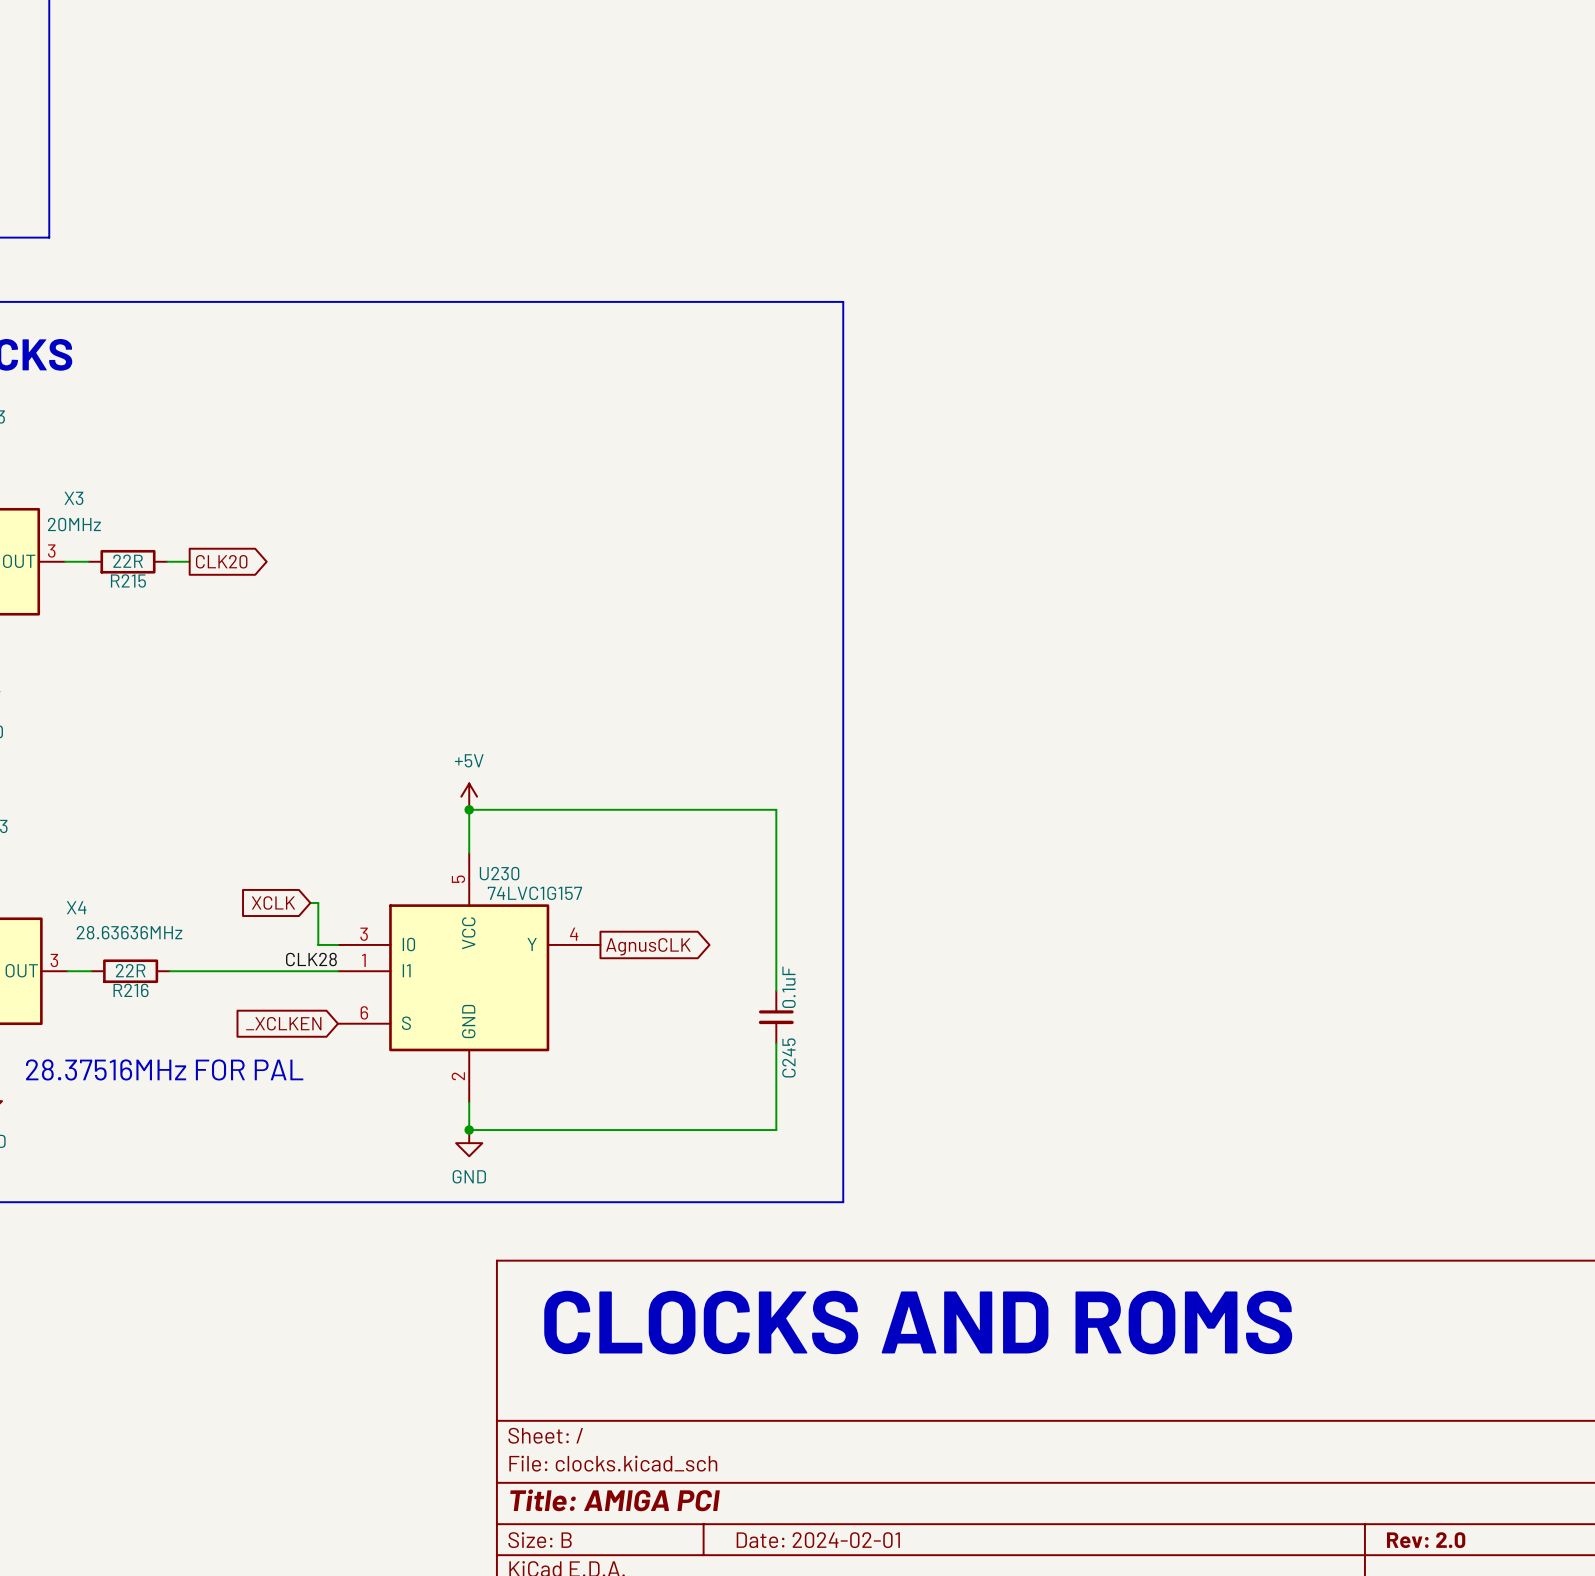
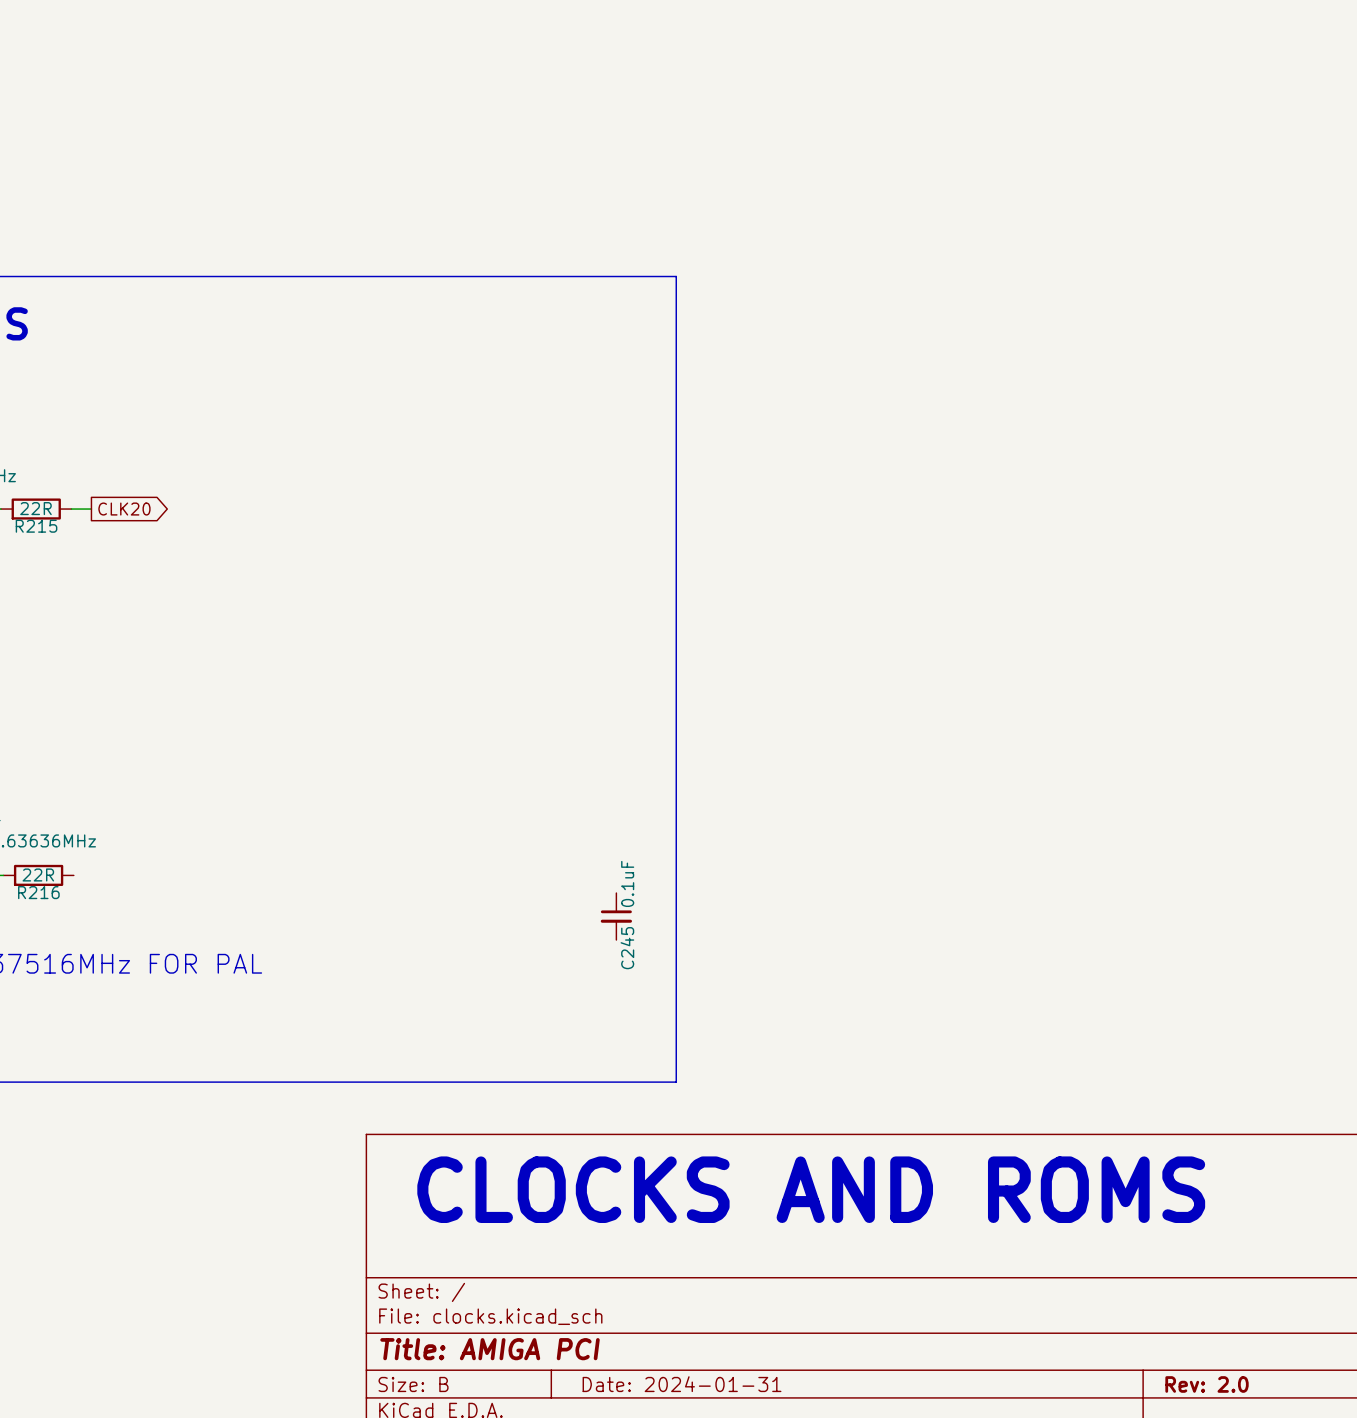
power symbol: +5V (469, 796) -> none
junction: (469, 809) -> none
wire: (469, 853) (469, 809) (776, 809) (776, 990) -> none
global label: XCLK (273, 902) -> none
wire: (310, 902) (318, 902) (318, 944) (337, 944) -> none
global label: AgnusCLK (648, 946) -> none
label: CLK28 (311, 959) -> none
wire: (169, 971) (337, 971) -> none
U230: 74LVC1G157 (469, 977) -> none
global label: _XCLKEN (283, 1023) -> none
wire: (776, 1043) (776, 1130) (469, 1130) (469, 1102) -> none
junction: (469, 1130) -> none
power symbol: GND (469, 1143) -> none
title block: Date: 2024-02-01 (818, 1540) -> Date: 2024-01-31 (682, 1384)

